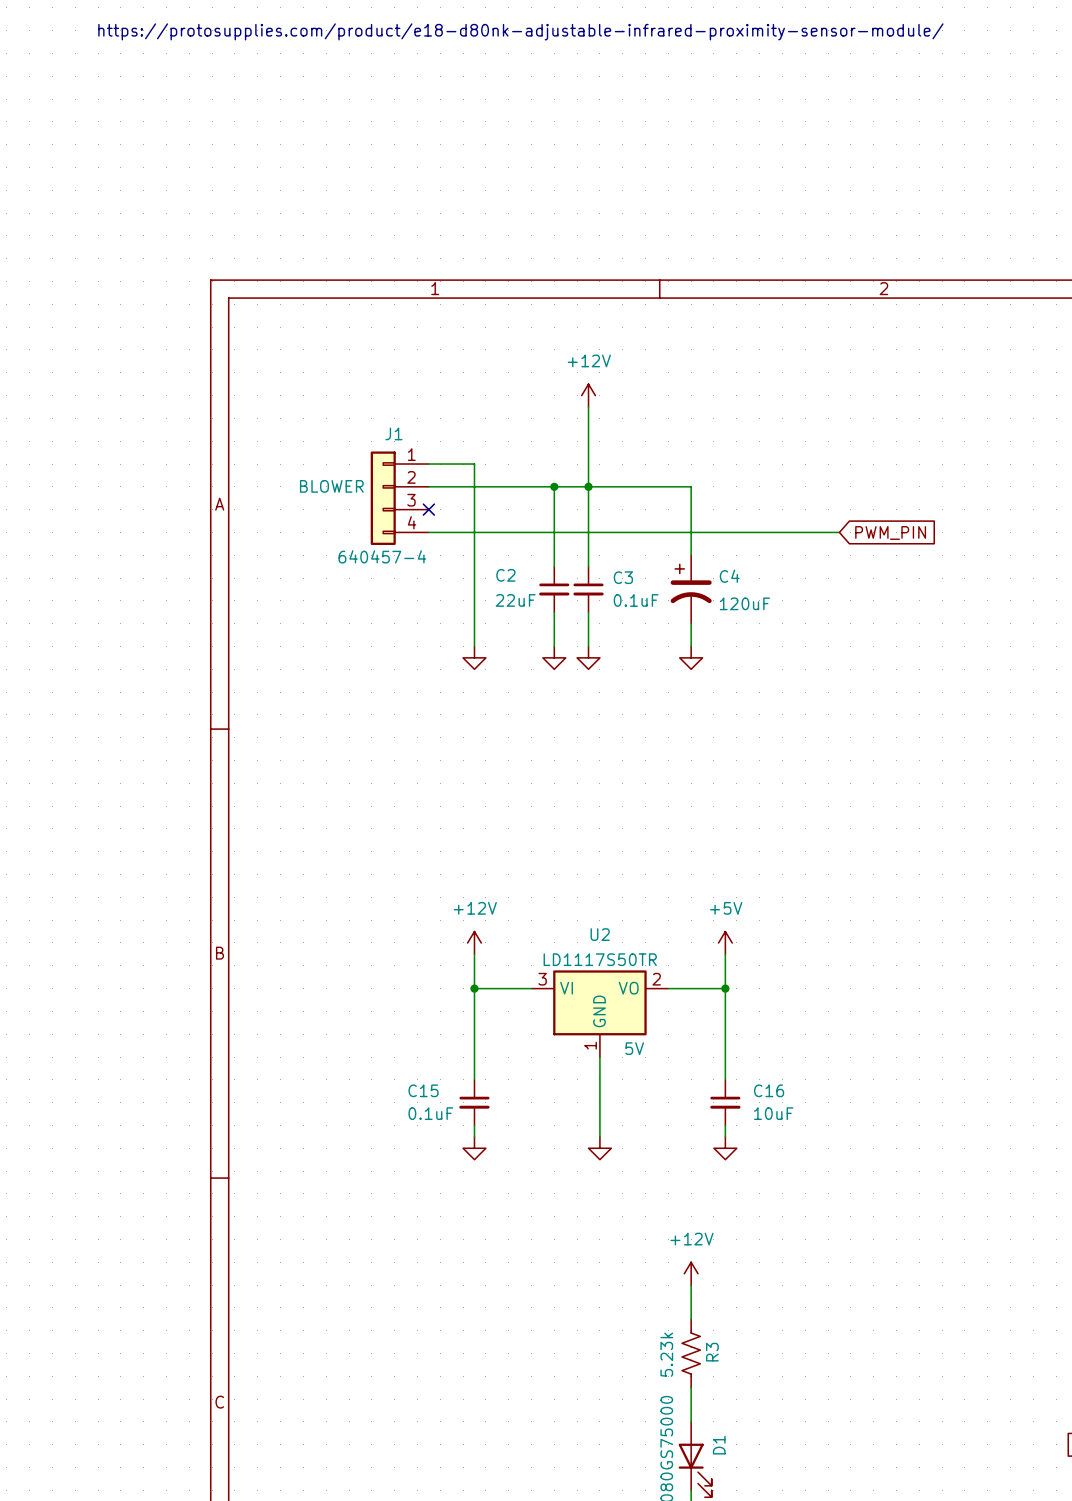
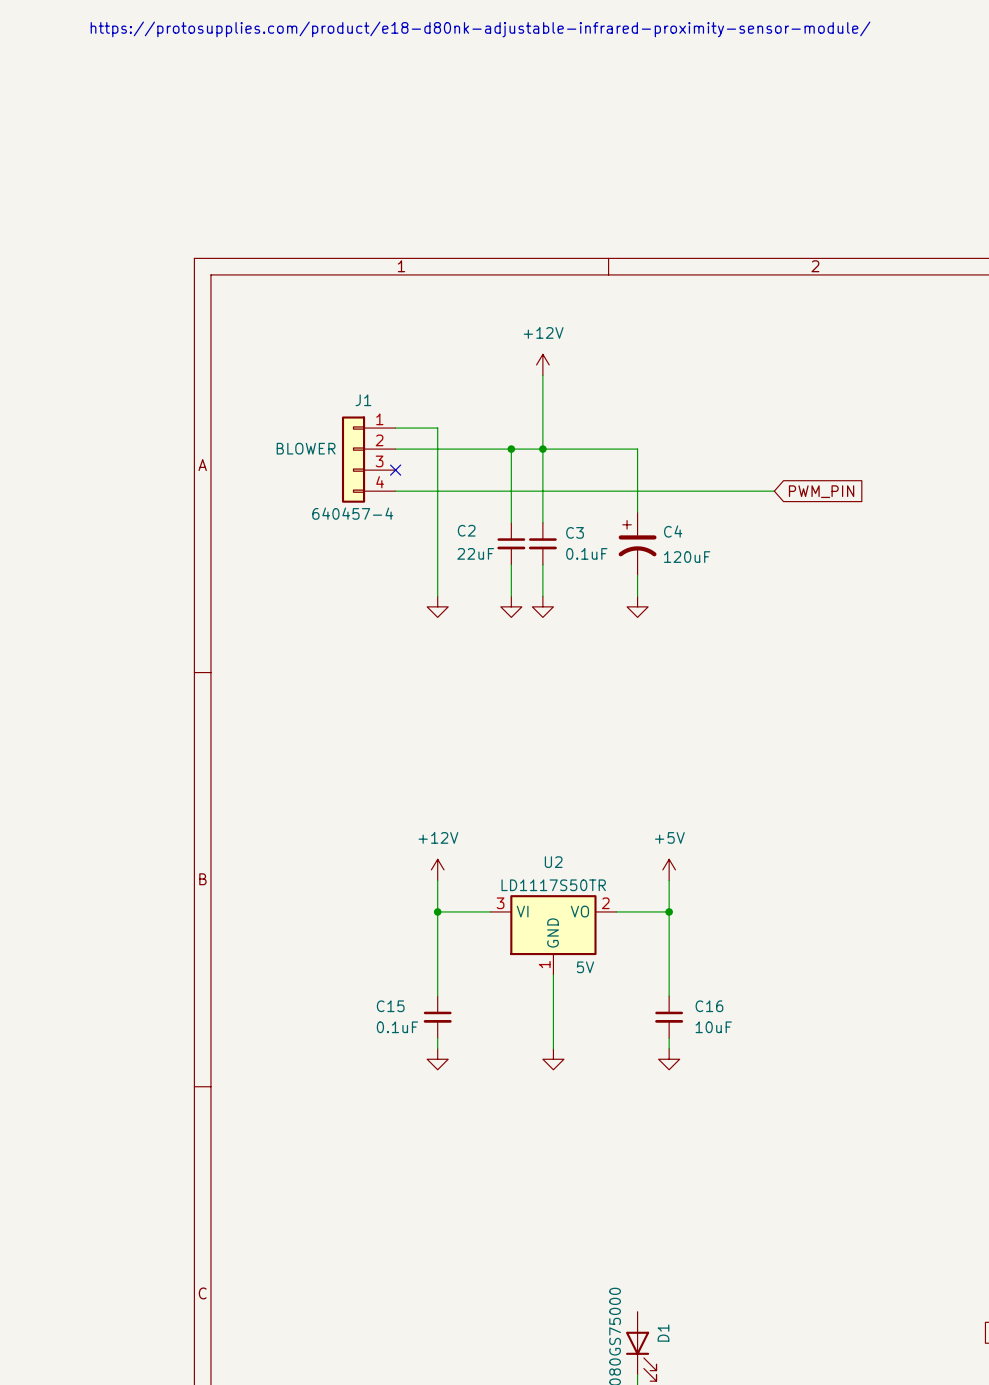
power symbol: +12V (691, 1273) -> none
wire: (691, 1285) (691, 1319) -> none
R3: 5.23k (691, 1353) -> none
wire: (691, 1387) (691, 1421) -> none

